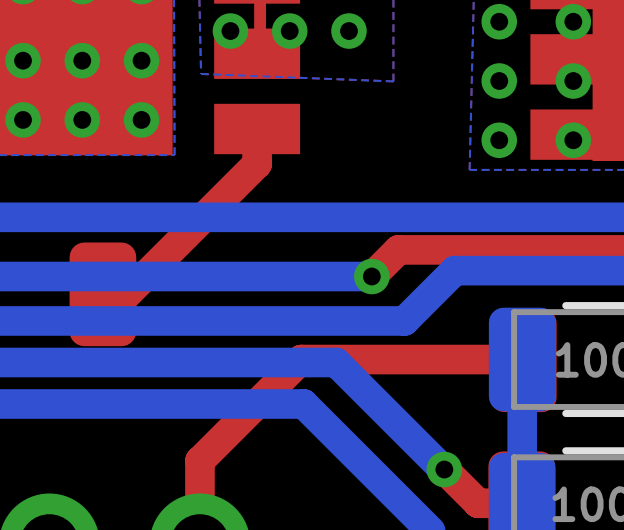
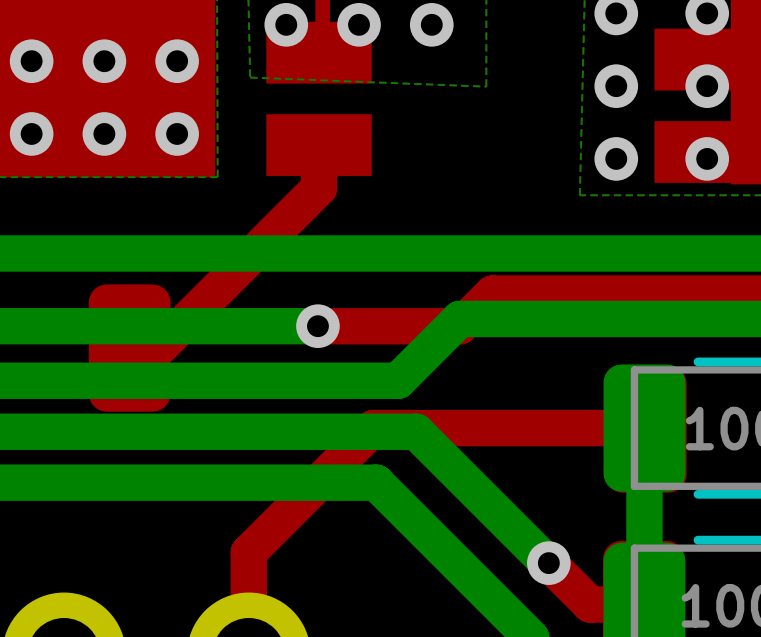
bottom track: (454, 270) (404, 320) (321, 320) -> (561, 318) (459, 318) (398, 380)
top track: none -> (459, 326) (318, 326)
bottom track: (371, 276) (256, 276) -> none
via position: (371, 276) -> (317, 326)

